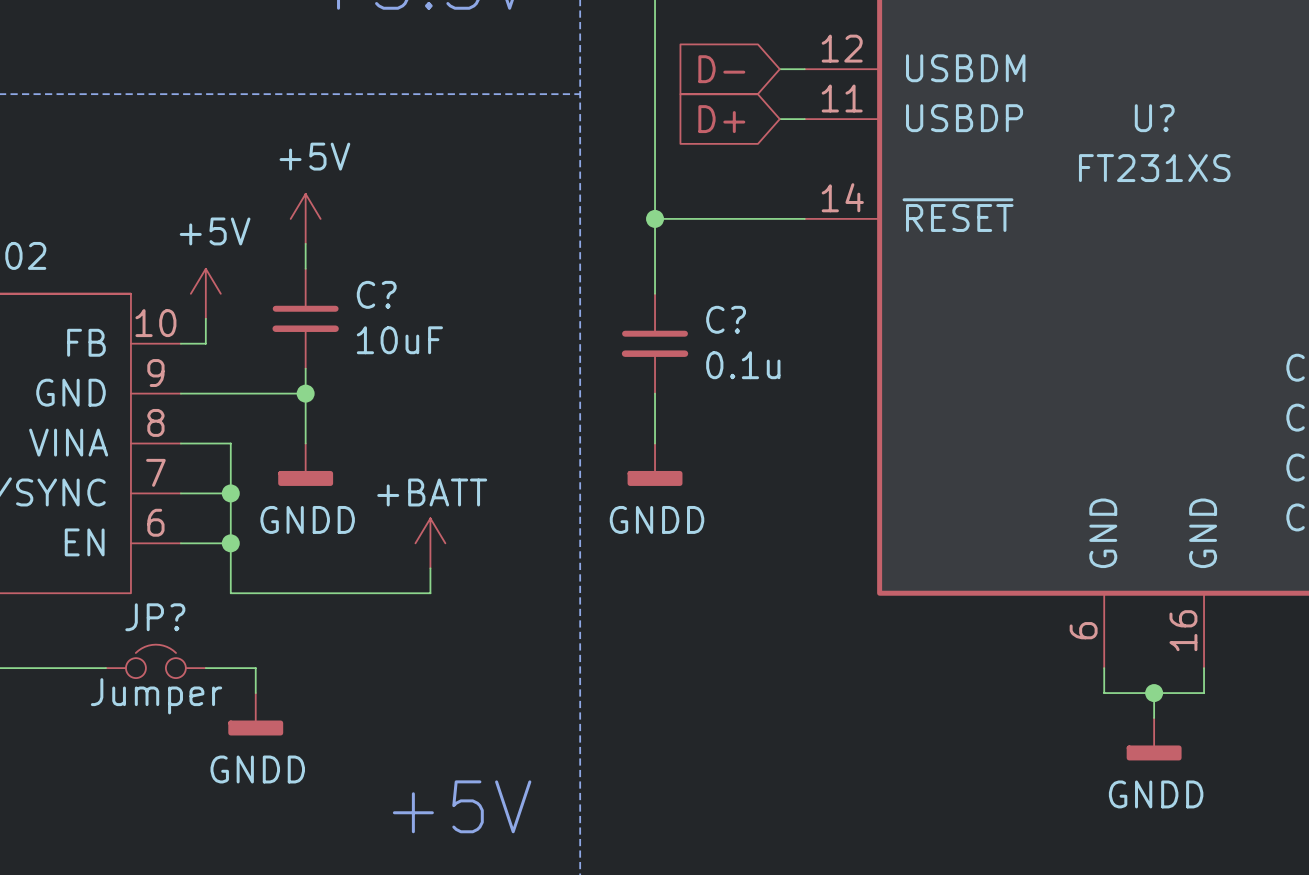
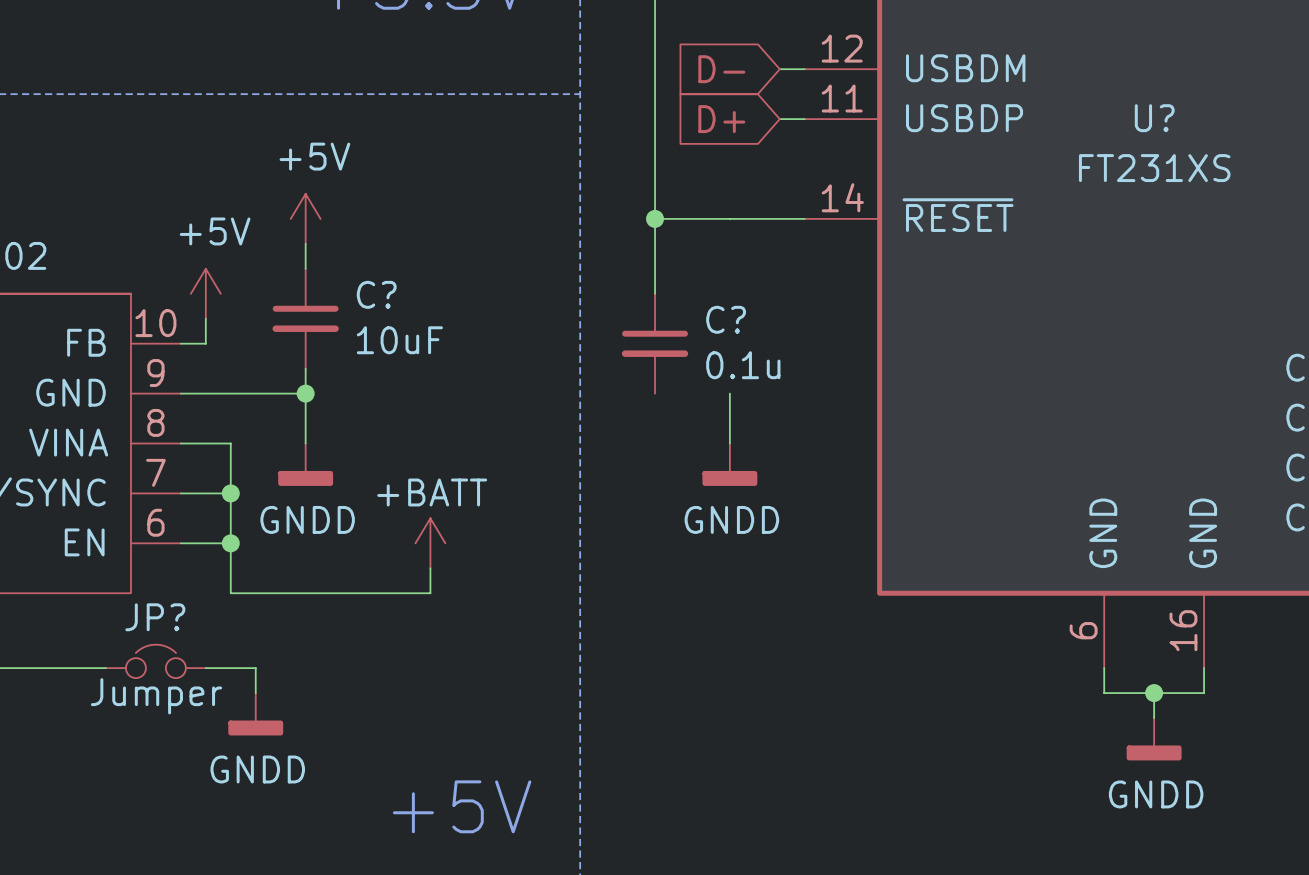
wire: (655, 393) (655, 443) -> (729, 393) (729, 443)
power symbol position: GNDD (655, 464) -> GNDD (729, 464)

